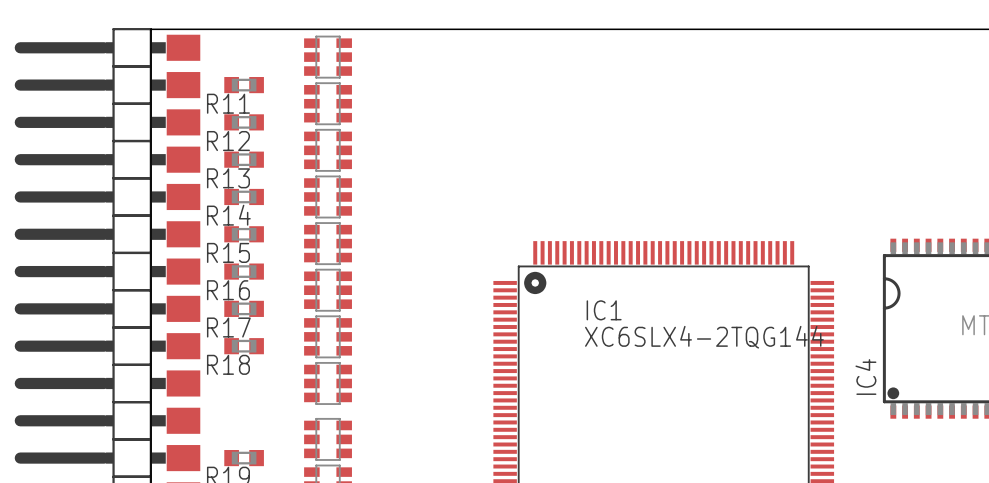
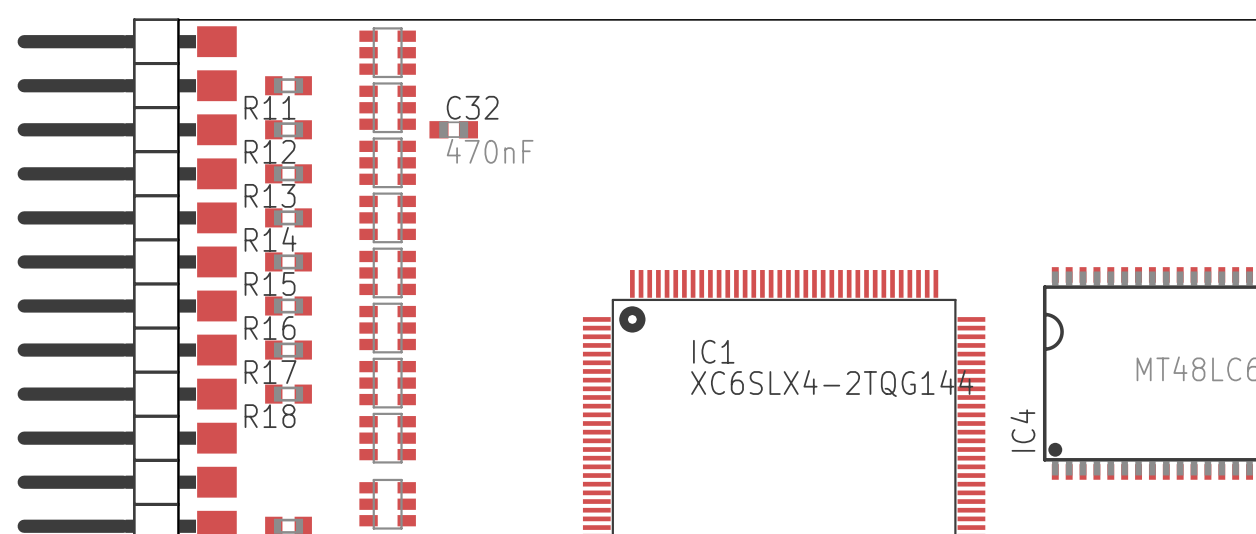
C32: none -> 470nF (453, 129)

